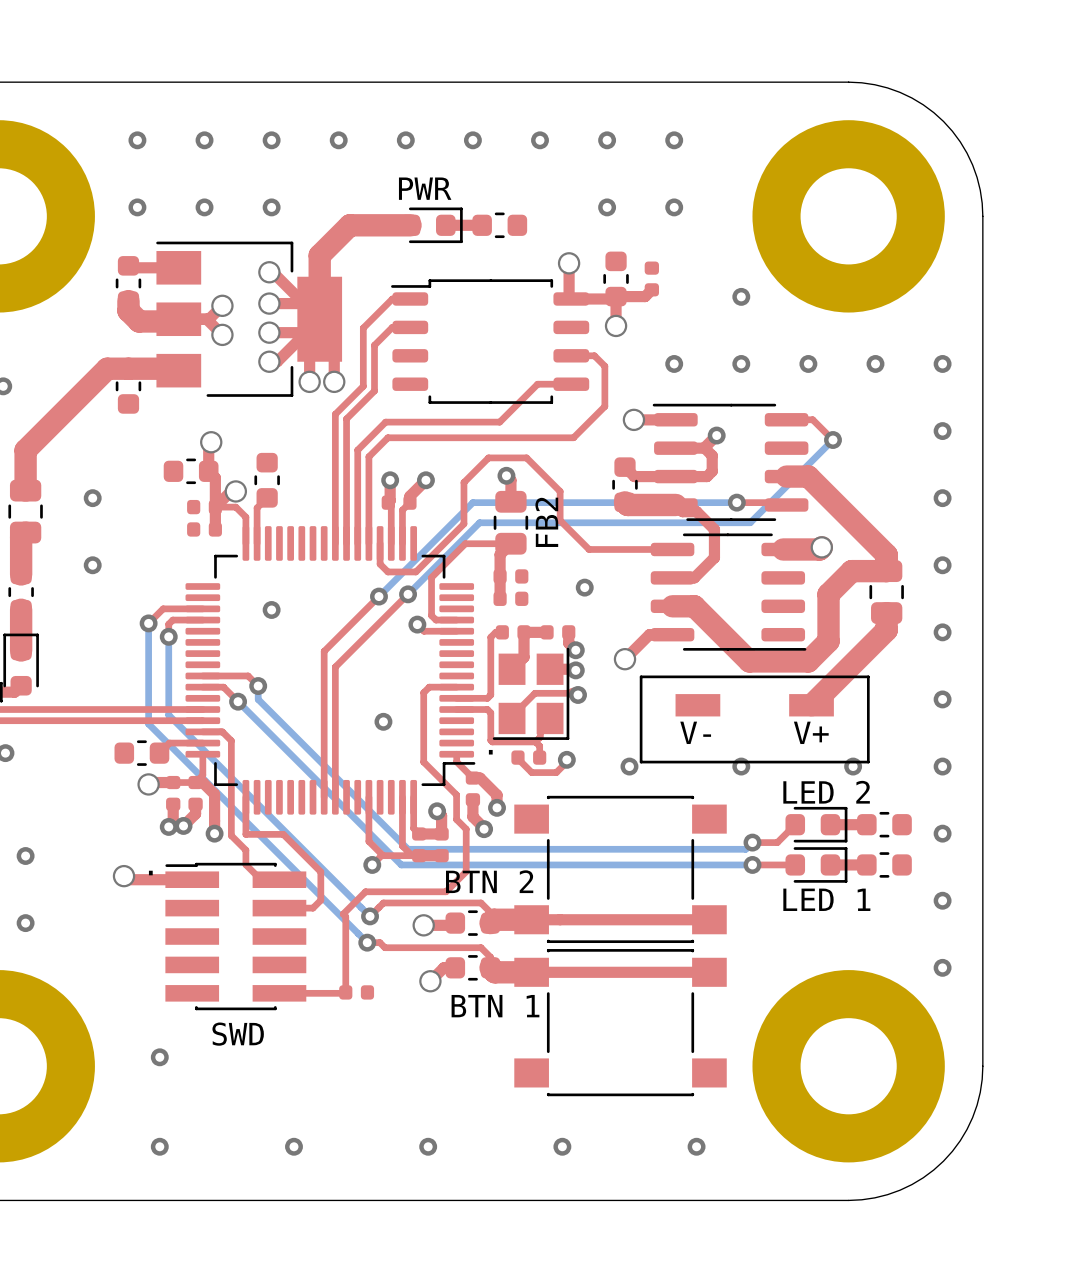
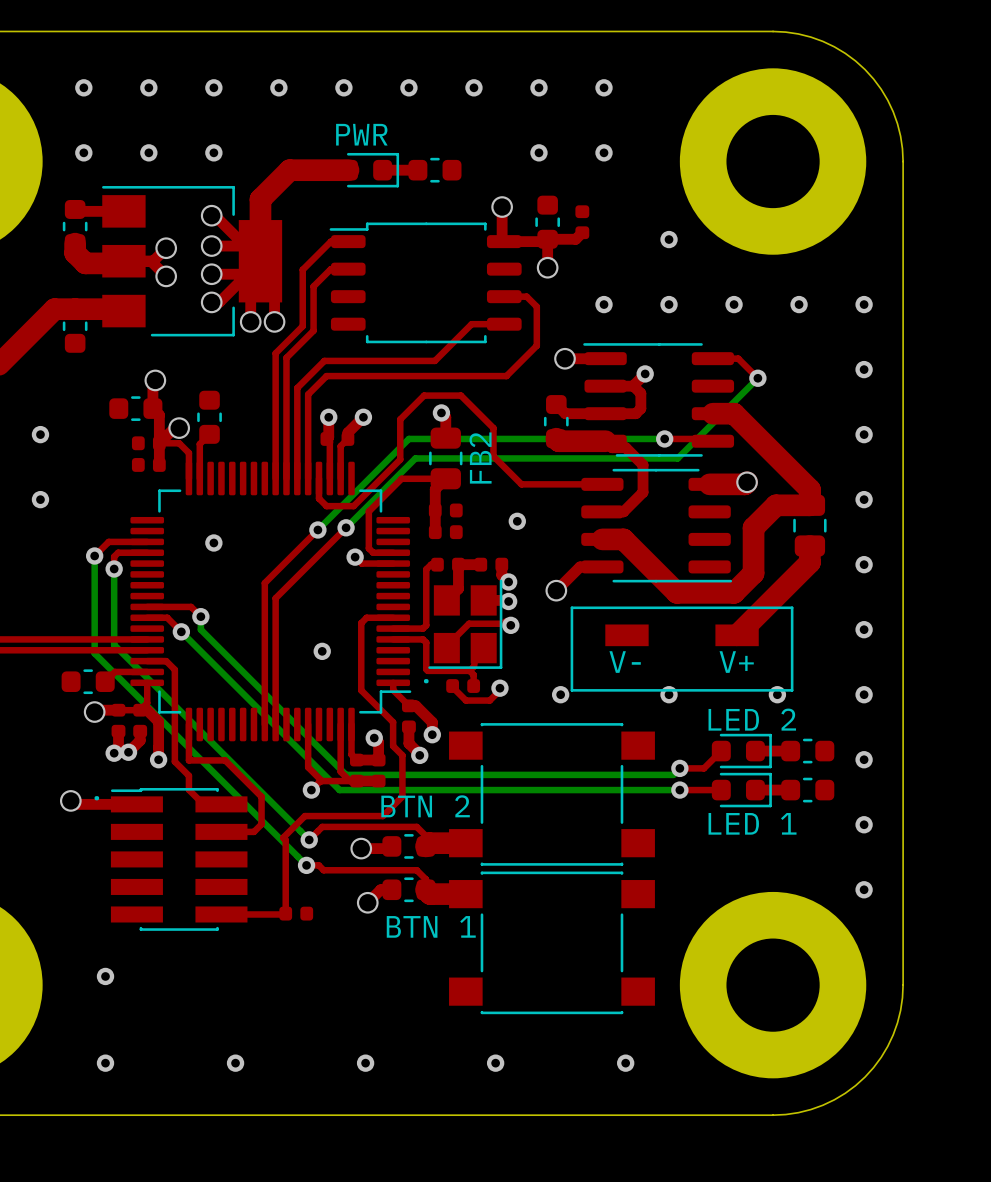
top track: (531, 919) (709, 919) -> none
top track: (531, 972) (709, 972) -> none
text: SWD (238, 1034) -> none

